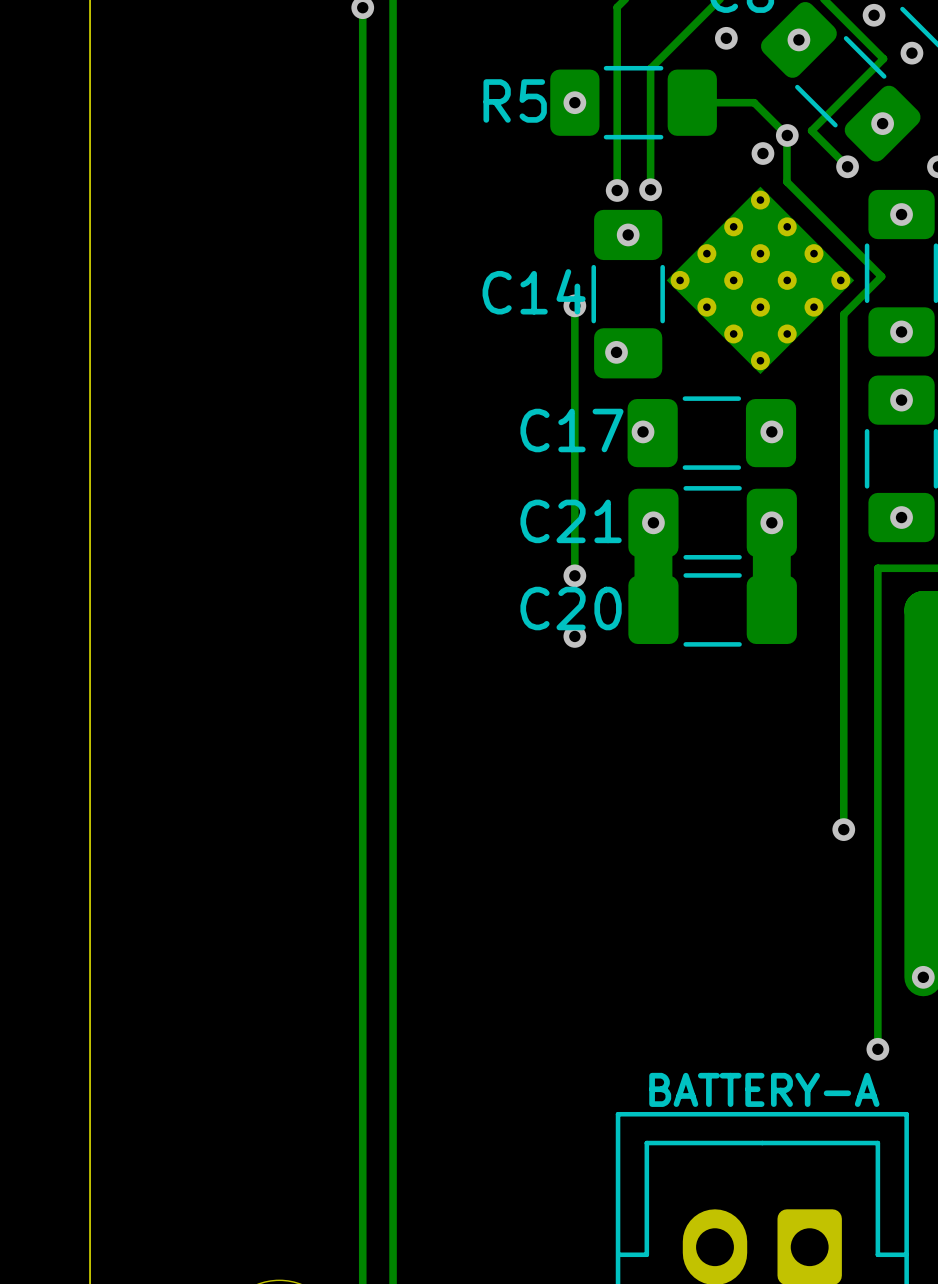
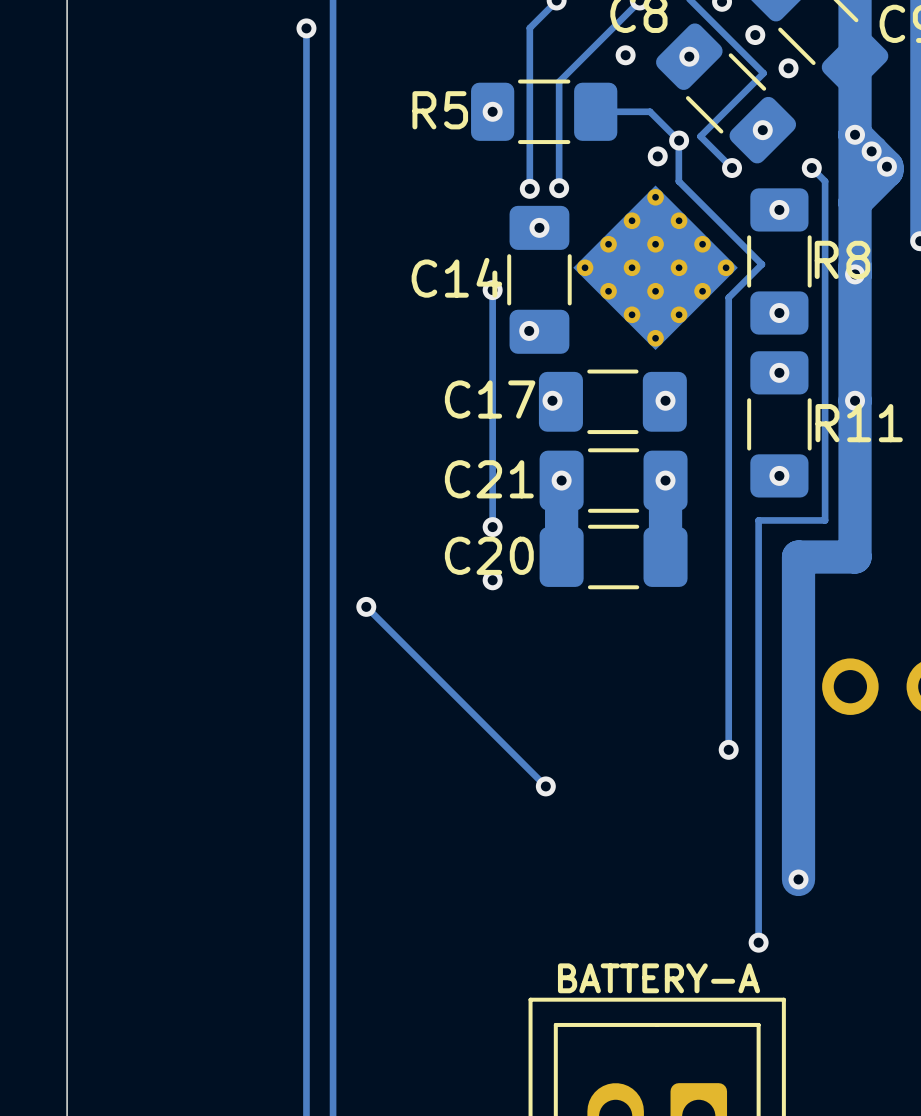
track: none -> (366, 606) (545, 786)
via: none -> (366, 606)
via: none -> (545, 786)

